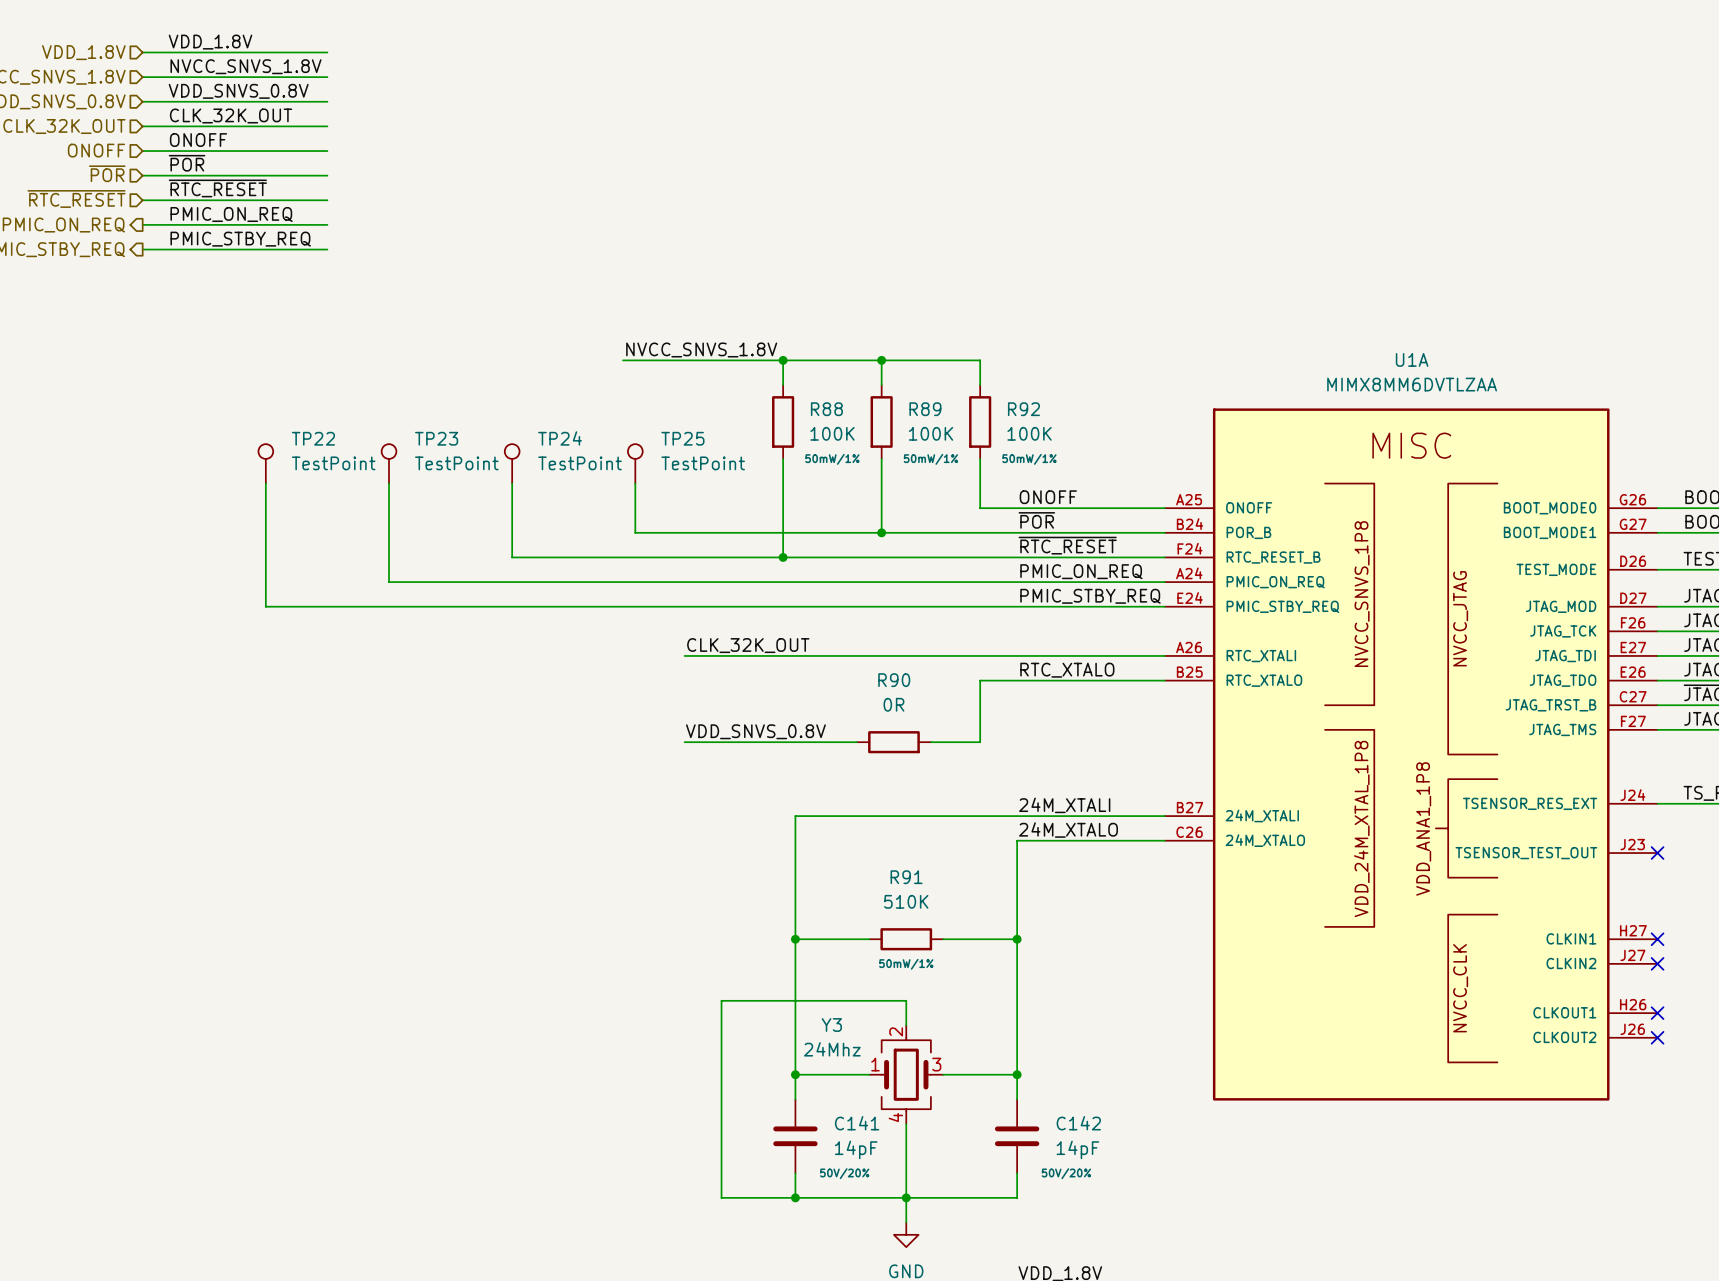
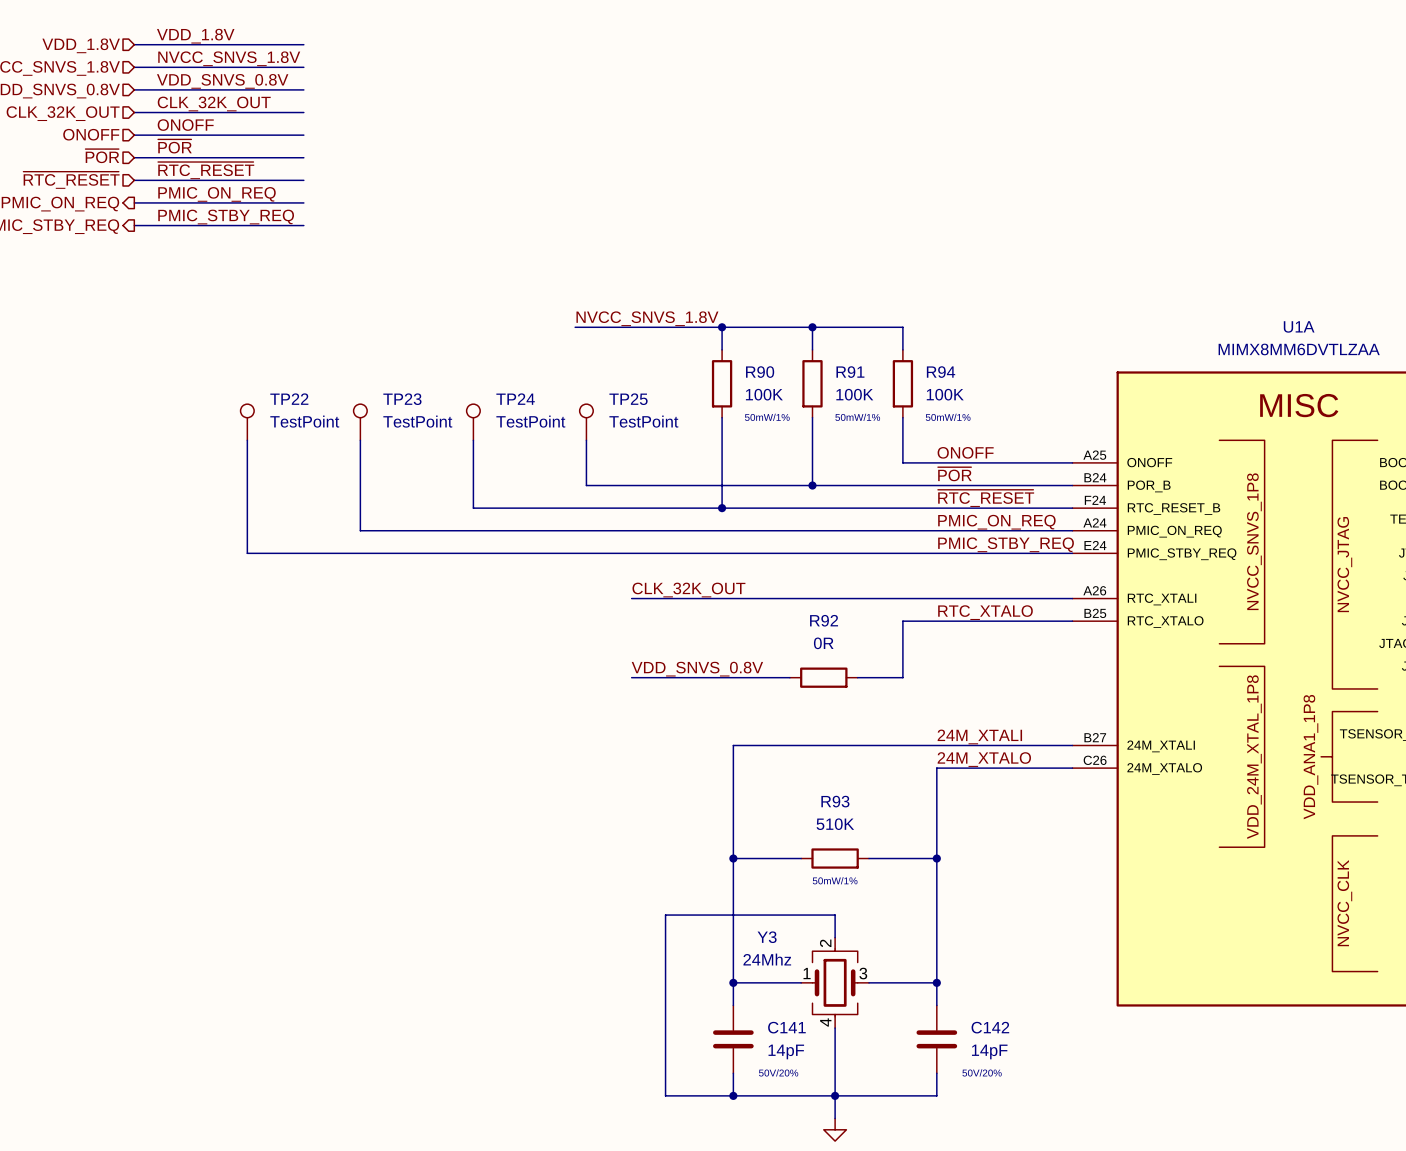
R88 name: R88 (826, 409) -> R90 (760, 372)
R89 name: R89 (925, 409) -> R91 (850, 372)
R92 name: R92 (1023, 409) -> R94 (941, 372)
R90 name: R90 (894, 680) -> R92 (824, 620)
R91 name: R91 (906, 877) -> R93 (835, 801)

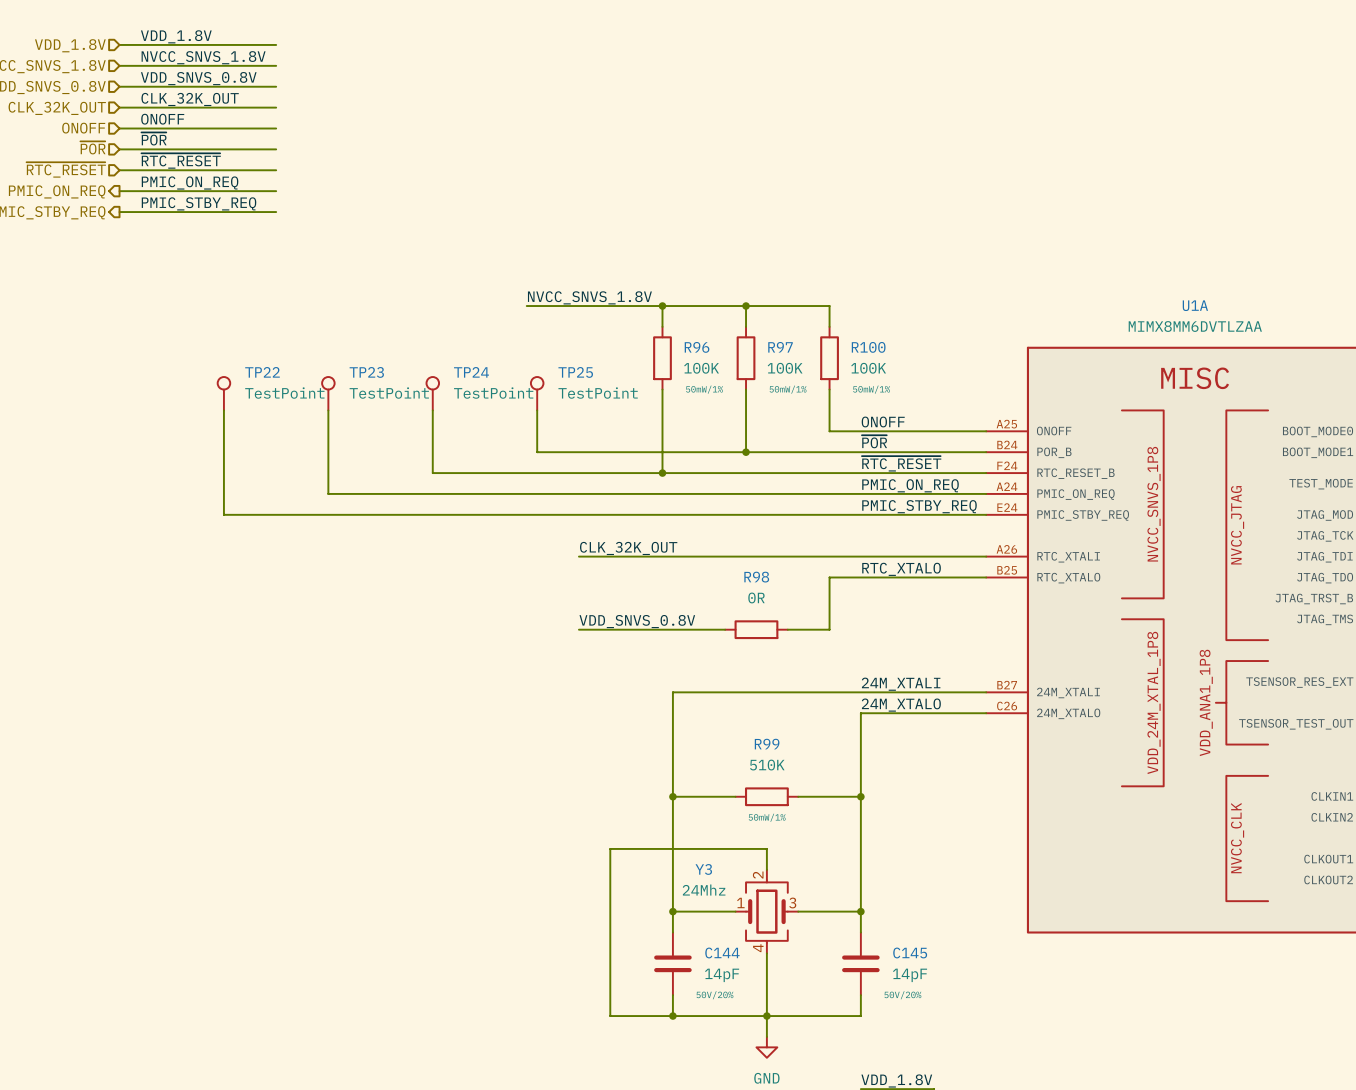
R90 name: R90 (760, 372) -> R96 (697, 347)
R91 name: R91 (850, 372) -> R97 (780, 347)
R94 name: R94 (941, 372) -> R100 (868, 347)
R92 name: R92 (824, 620) -> R98 (756, 577)
R93 name: R93 (835, 801) -> R99 (767, 744)
C141 name: C141 (786, 1027) -> C144 (722, 952)
C142 name: C142 (990, 1027) -> C145 (910, 952)

